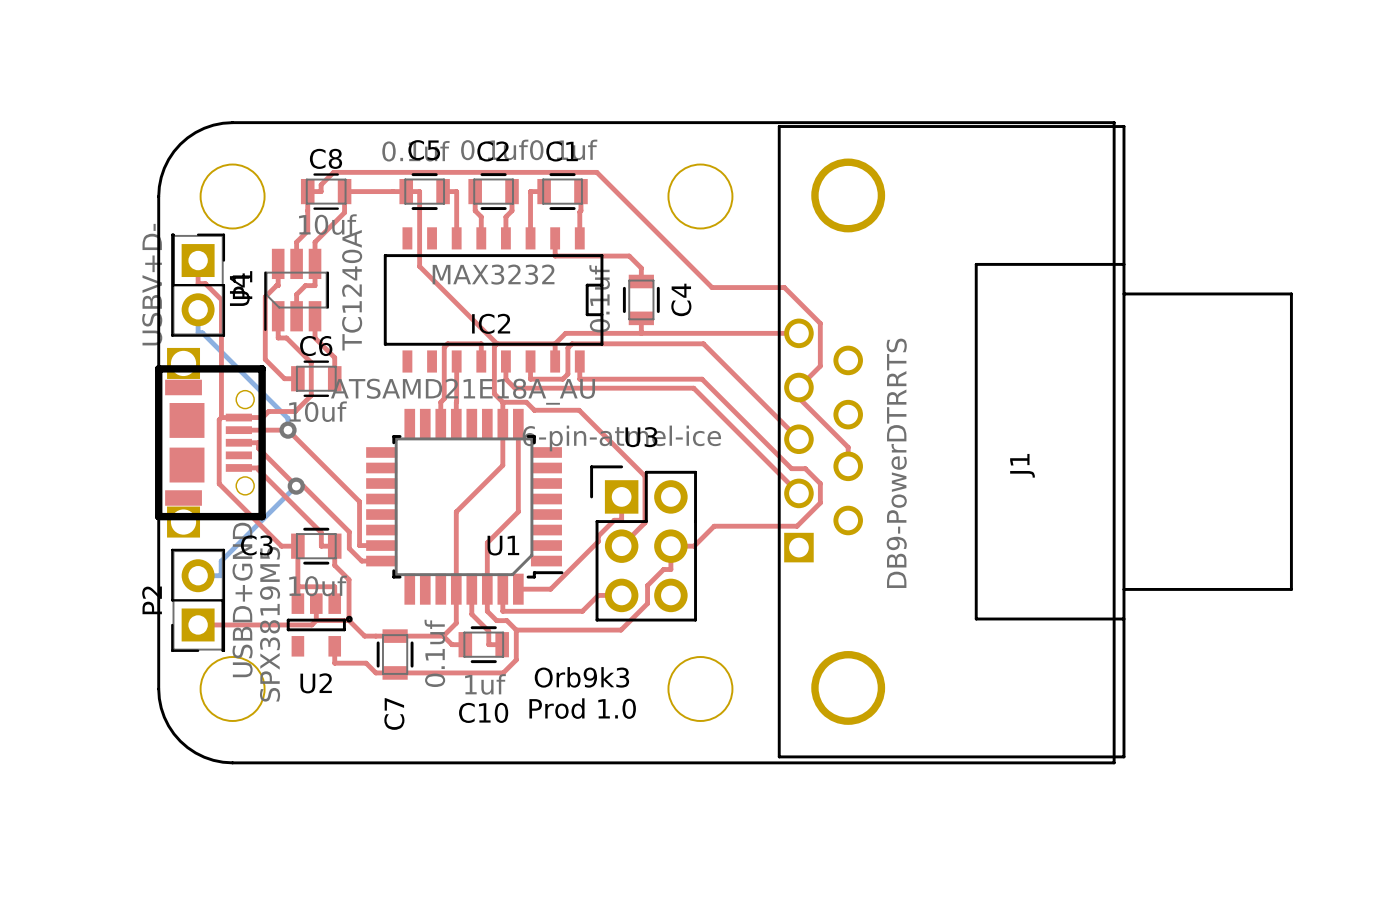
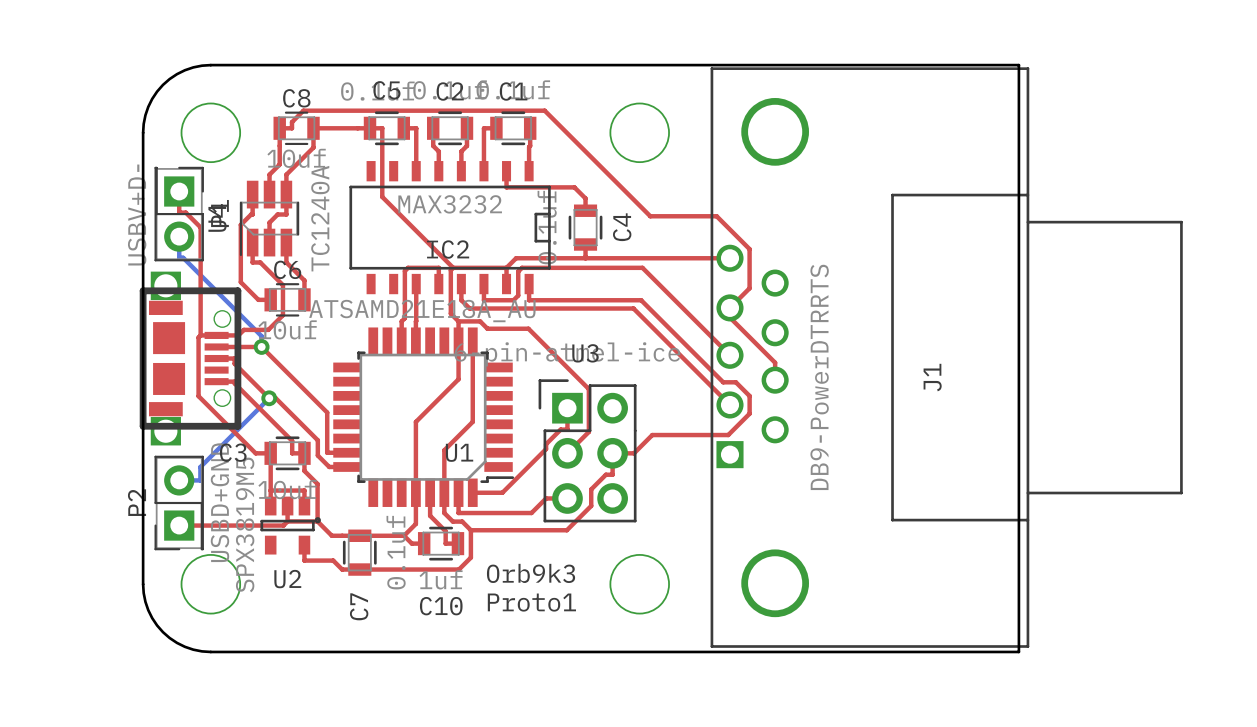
text: Prod 1.0 (582, 708) -> Proto1 (531, 602)

